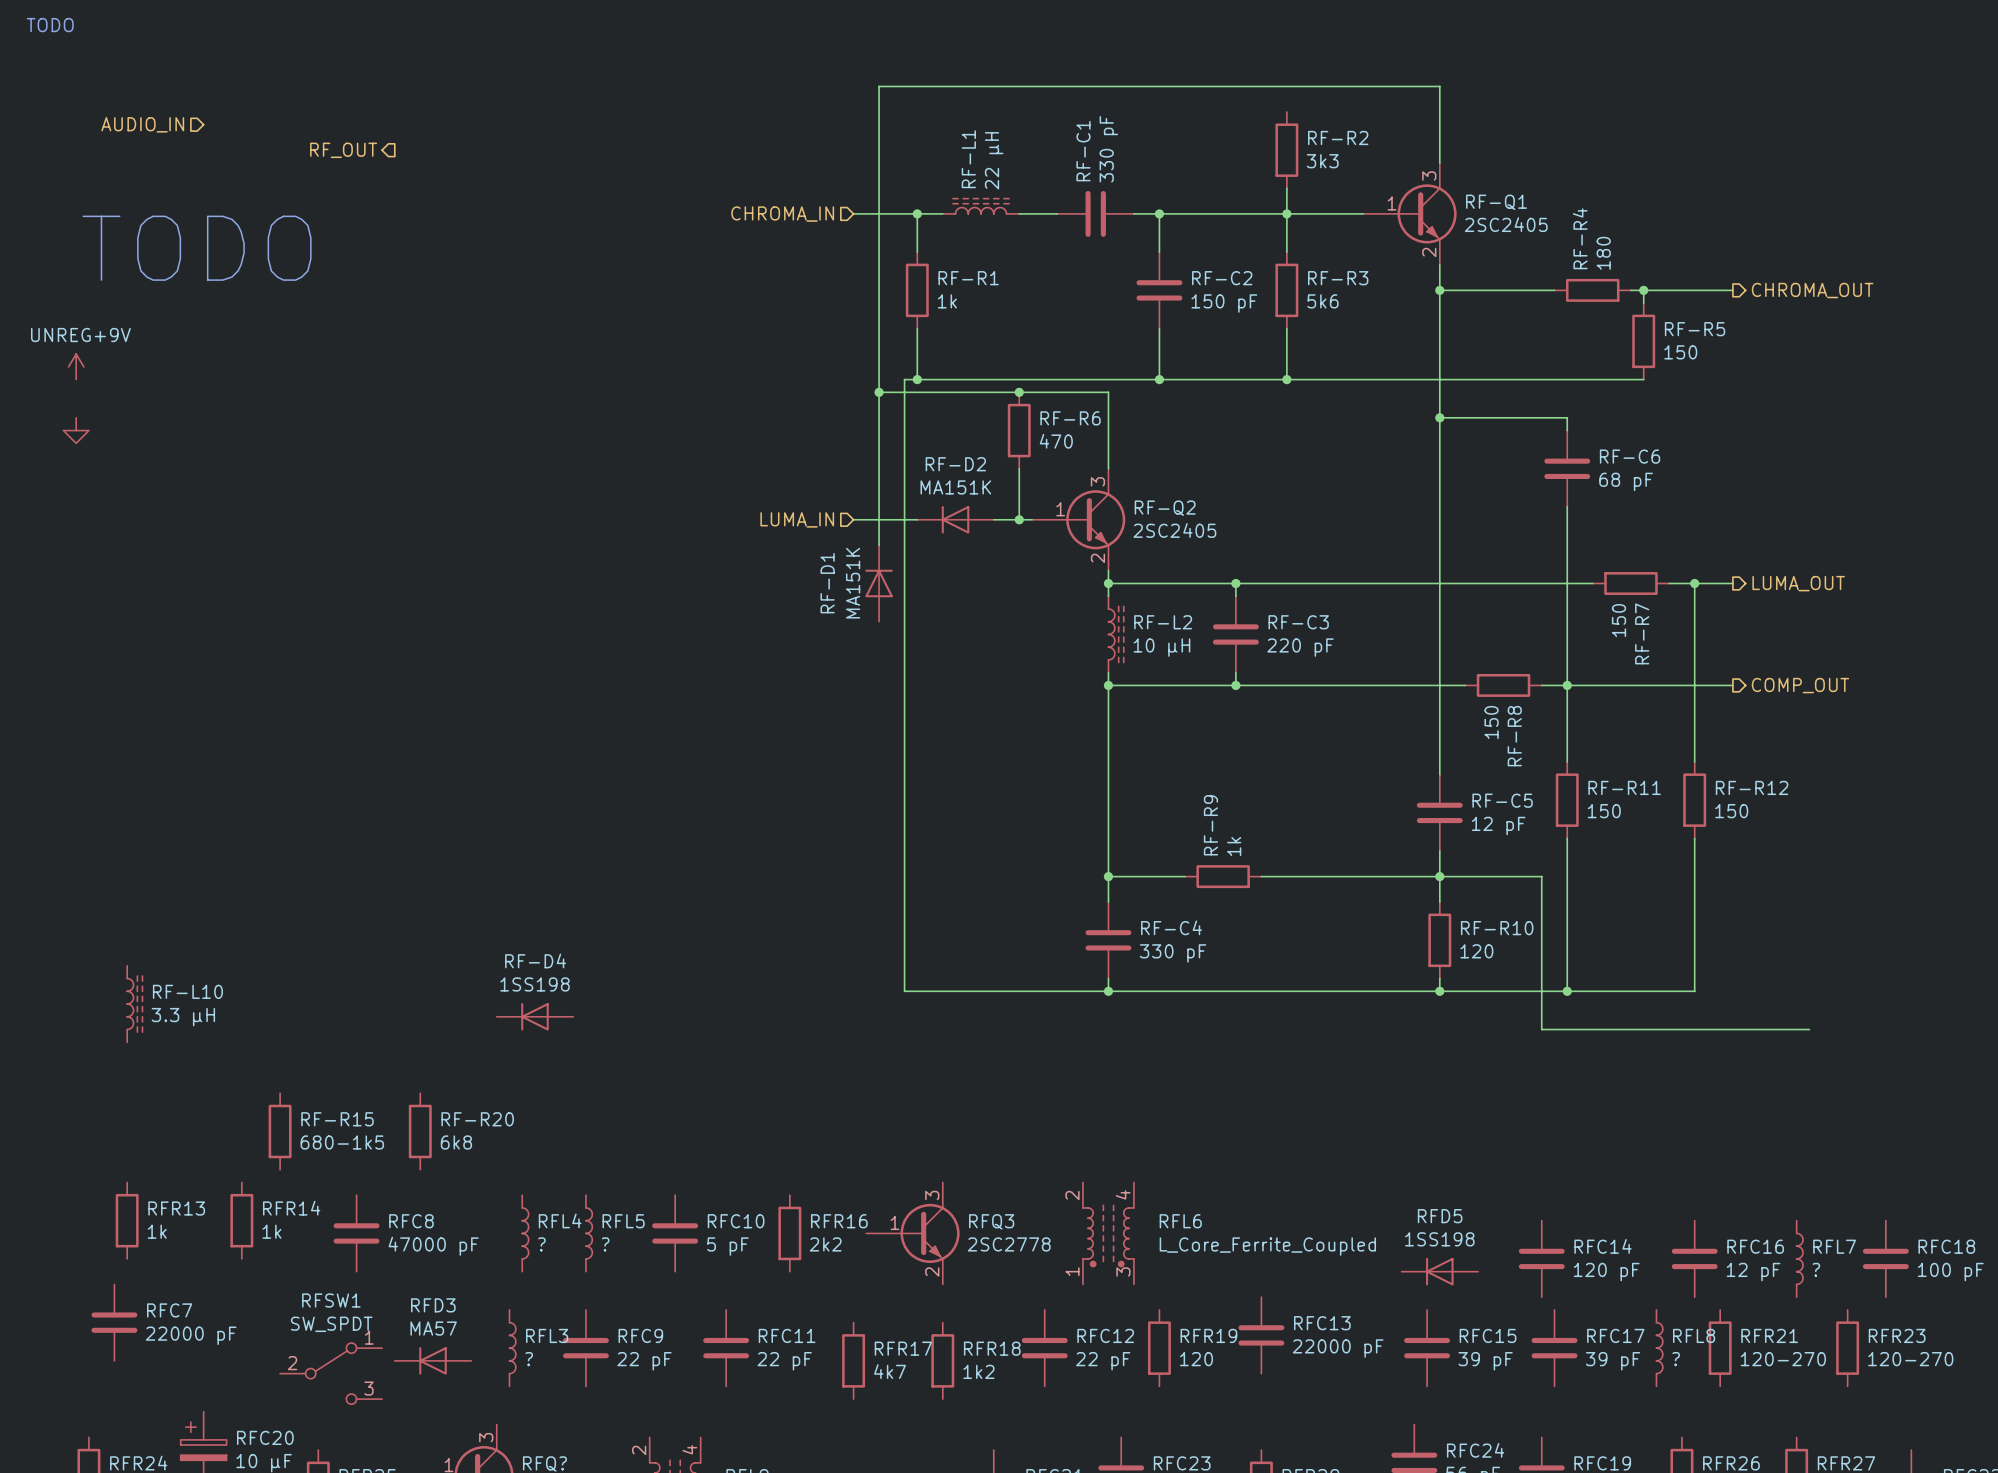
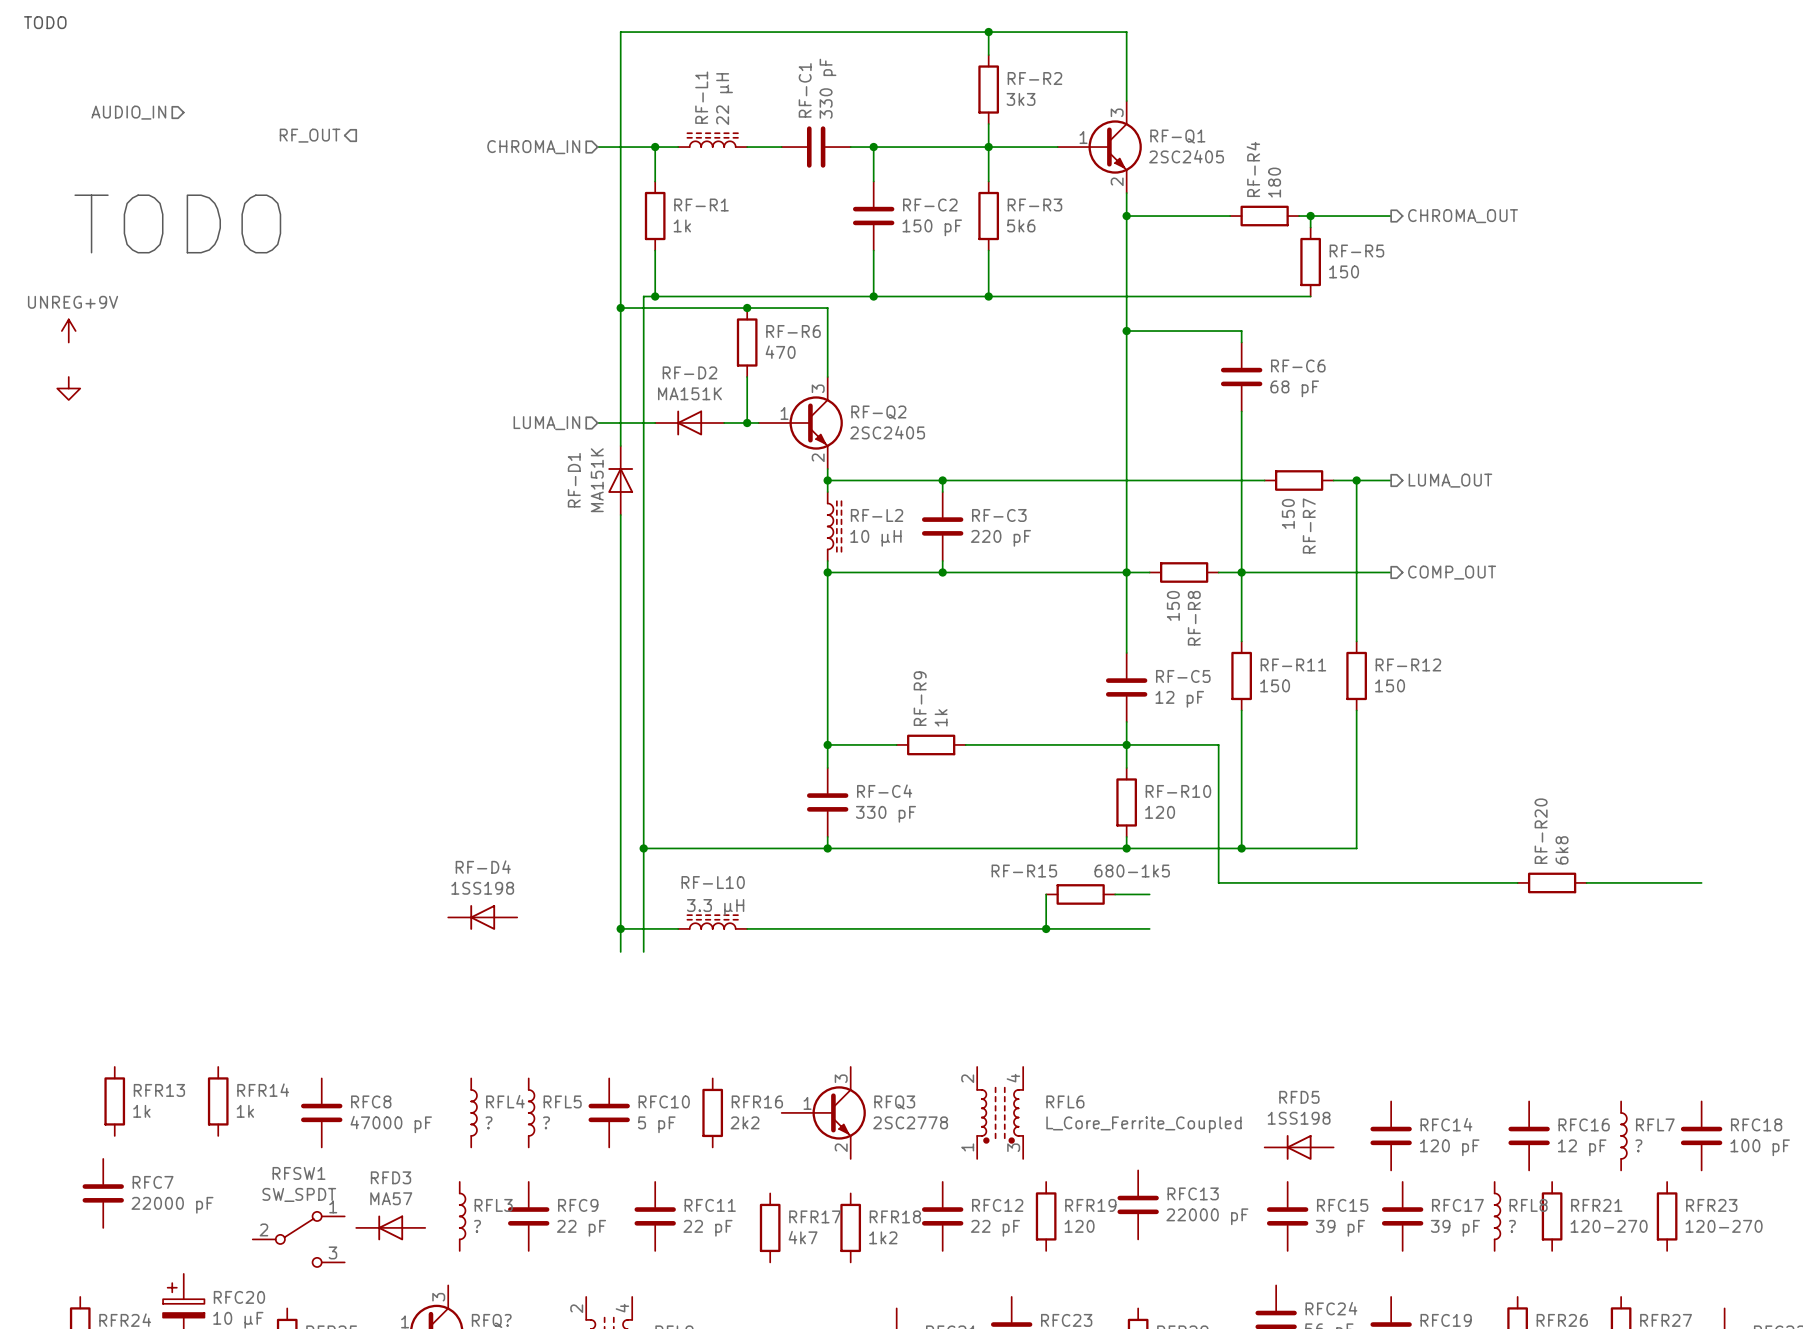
wire: none -> (988, 32) (988, 55)
junction: none -> (988, 32)
RF-R2 position: (1286, 150) -> (988, 89)
junction: none -> (655, 147)
junction: none -> (873, 147)
junction: none -> (988, 147)
wire: (1439, 162) (1439, 86) (879, 86) (879, 545) -> (1126, 101) (1126, 32) (620, 32) (620, 445)
wire: (1286, 188) (1286, 252) -> (988, 124) (988, 181)
RF-L1 position: (981, 206) -> (712, 140)
wire: (853, 213) (942, 213) -> (597, 147) (678, 147)
wire: (917, 213) (917, 252) -> (655, 147) (655, 181)
junction: (917, 213) -> none
wire: (1019, 213) (1057, 213) -> (747, 147) (781, 147)
RF-C1 position: (1095, 213) -> (816, 147)
wire: (1133, 213) (1363, 213) -> (850, 147) (1057, 147)
wire: (1159, 213) (1159, 252) -> (873, 147) (873, 181)
junction: (1159, 213) -> none
junction position: (1286, 213) -> (1126, 216)
RF-Q1 position: (1409, 213) -> (1099, 147)
hierarchical label position: CHROMA_IN (782, 214) -> CHROMA_IN (533, 147)
wire: (1439, 264) (1439, 774) -> (1126, 193) (1126, 652)
wire: none -> (655, 250) (655, 296)
RF-R1 position: (917, 290) -> (655, 216)
RF-C2 position: (1159, 290) -> (873, 216)
RF-R3 position: (1286, 290) -> (988, 216)
wire: (1439, 290) (1554, 290) -> (1126, 216) (1230, 216)
junction position: (1439, 290) -> (1310, 216)
RF-R4 position: (1592, 290) -> (1264, 216)
wire: (1630, 290) (1732, 290) -> (1299, 216) (1391, 216)
wire: (1643, 290) (1643, 303) -> (1310, 216) (1310, 227)
junction: (1643, 290) -> none
hierarchical label position: CHROMA_OUT (1812, 290) -> CHROMA_OUT (1463, 216)
junction: none -> (655, 296)
wire: (917, 328) (917, 341) -> (620, 308) (827, 308)
junction: none -> (873, 296)
junction: none -> (988, 296)
wire: (1159, 328) (1159, 379) -> (873, 250) (873, 296)
wire: (1286, 328) (1286, 379) -> (988, 250) (988, 296)
wire: none -> (1310, 296) (643, 296) (643, 951)
junction: none -> (620, 308)
junction: none -> (747, 308)
RF-R5 position: (1643, 341) -> (1310, 262)
wire: none -> (827, 342) (827, 377)
junction: (917, 379) -> none
junction: (1159, 379) -> none
junction position: (1286, 379) -> (1126, 331)
wire: (1643, 379) (904, 379) (904, 991) (1235, 991) -> none
wire: (879, 392) (1108, 392) (1108, 468) -> none
junction: (879, 392) -> none
junction: (1019, 392) -> none
wire: (1439, 417) (1567, 417) (1567, 430) -> (1126, 331) (1241, 331) (1241, 342)
junction: (1439, 417) -> none
RF-R6 position: (1019, 430) -> (747, 342)
wire: none -> (597, 423) (655, 423)
junction: none -> (747, 423)
wire: (1019, 468) (1019, 519) -> (747, 377) (747, 423)
RF-C6 position: (1567, 468) -> (1241, 377)
wire: (1567, 507) (1567, 761) -> (1241, 411) (1241, 641)
hierarchical label position: LUMA_IN (797, 519) -> LUMA_IN (546, 423)
wire: (853, 519) (917, 519) -> (827, 491) (827, 468)
RF-D2 position: (955, 519) -> (689, 423)
wire: (993, 519) (1032, 519) -> (724, 423) (758, 423)
junction position: (1019, 519) -> (942, 480)
RF-Q2 position: (1078, 519) -> (800, 423)
junction: none -> (827, 480)
junction: none -> (1356, 480)
wire: none -> (620, 514) (620, 951)
wire: (1108, 570) (1108, 596) -> none
RF-D1 position: (879, 583) -> (620, 480)
wire: (1108, 583) (1592, 583) -> (827, 480) (1264, 480)
junction: (1108, 583) -> none
wire: (1235, 583) (1235, 596) -> (942, 480) (942, 491)
junction: (1235, 583) -> none
RF-R7 position: (1630, 583) -> (1299, 480)
wire: (1669, 583) (1732, 583) -> (1333, 480) (1391, 480)
wire: (1694, 583) (1694, 761) -> (1356, 480) (1356, 641)
junction: (1694, 583) -> none
hierarchical label position: LUMA_OUT (1798, 583) -> LUMA_OUT (1450, 480)
junction: none -> (827, 572)
junction: none -> (942, 572)
RF-L2 position: (1116, 634) -> (834, 526)
RF-C3 position: (1235, 634) -> (942, 526)
junction: none -> (1126, 572)
junction: none -> (1241, 572)
wire: (1108, 672) (1108, 902) -> (827, 560) (827, 767)
wire: (1235, 672) (1235, 685) -> (942, 560) (942, 572)
wire: (1108, 685) (1465, 685) -> (827, 572) (1149, 572)
junction: (1108, 685) -> none
junction: (1235, 685) -> none
RF-R8 position: (1503, 685) -> (1184, 572)
wire: (1541, 685) (1732, 685) -> (1218, 572) (1391, 572)
junction: (1567, 685) -> none
hierarchical label position: COMP_OUT (1800, 685) -> COMP_OUT (1452, 572)
wire: none -> (1356, 710) (1356, 848) (643, 848)
RF-R11 position: (1567, 800) -> (1241, 675)
RF-R12 position: (1694, 800) -> (1356, 675)
RF-C5 position: (1439, 812) -> (1126, 687)
junction: none -> (827, 744)
wire: none -> (965, 744) (1218, 744) (1218, 882) (1517, 882)
junction: none -> (1126, 744)
wire: (1567, 838) (1567, 991) -> (1241, 710) (1241, 848)
wire: (1694, 838) (1694, 991) (1274, 991) -> none
wire: (1439, 851) (1439, 902) -> (1126, 721) (1126, 767)
wire: (1108, 876) (1184, 876) -> (827, 744) (896, 744)
junction: (1108, 876) -> none
RF-R9 position: (1223, 876) -> (931, 744)
wire: (1261, 876) (1541, 876) (1541, 1029) (1809, 1029) -> none
junction: (1439, 876) -> none
junction: none -> (643, 848)
junction: none -> (827, 848)
RF-C4 position: (1108, 940) -> (827, 802)
junction: none -> (1126, 848)
junction: none -> (1241, 848)
RF-R10 position: (1439, 940) -> (1126, 802)
wire: (1108, 978) (1108, 991) -> (827, 836) (827, 848)
wire: (1439, 978) (1439, 991) -> (1126, 836) (1126, 848)
wire: none -> (1586, 882) (1701, 882)
junction: (1108, 991) -> none
wire: none -> (1046, 894) (1046, 928)
junction: (1439, 991) -> none
junction: (1567, 991) -> none
RF-L10 rotation: 0° (134, 1004) -> 90° counterclockwise (712, 922)
RF-L10 position: (134, 1004) -> (712, 922)
RF-L10 value position: 3.3 μH (183, 1017) -> 3.3 μH (715, 907)
wire: none -> (620, 928) (678, 928)
junction: none -> (620, 928)
wire: none -> (747, 928) (1149, 928)
junction: none -> (1046, 928)
RF-R15 name position: RF-R15 (337, 1119) -> RF-R15 (1024, 871)
RF-R20 name position: RF-R20 (477, 1119) -> RF-R20 (1541, 831)
RF-R15 rotation: 0° (280, 1131) -> 90° clockwise (1080, 894)
RF-R15 position: (280, 1131) -> (1080, 894)
RF-R20 rotation: 0° (420, 1131) -> 90° clockwise (1552, 882)
RF-R20 position: (420, 1131) -> (1552, 882)
RF-R15 value position: 680-1k5 (342, 1142) -> 680-1k5 (1132, 871)
RF-R20 value position: 6k8 (456, 1142) -> 6k8 (1562, 850)

